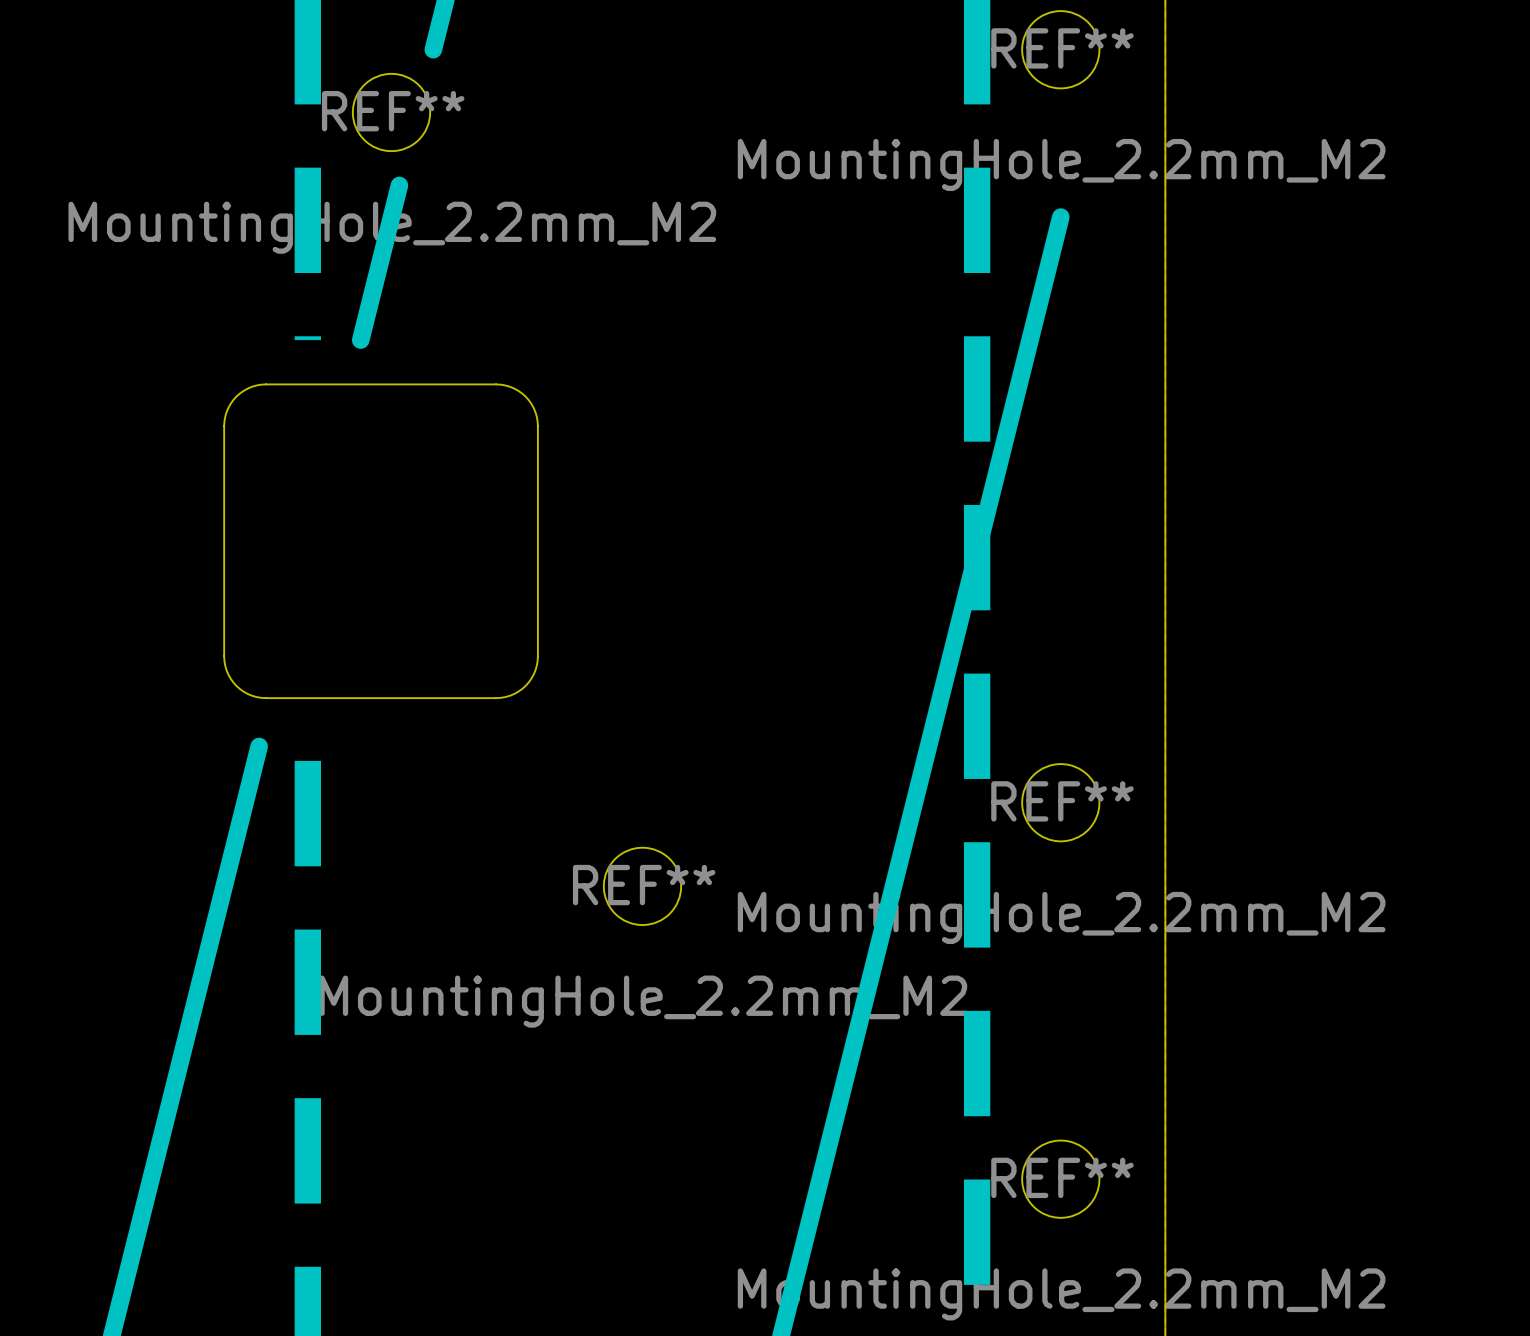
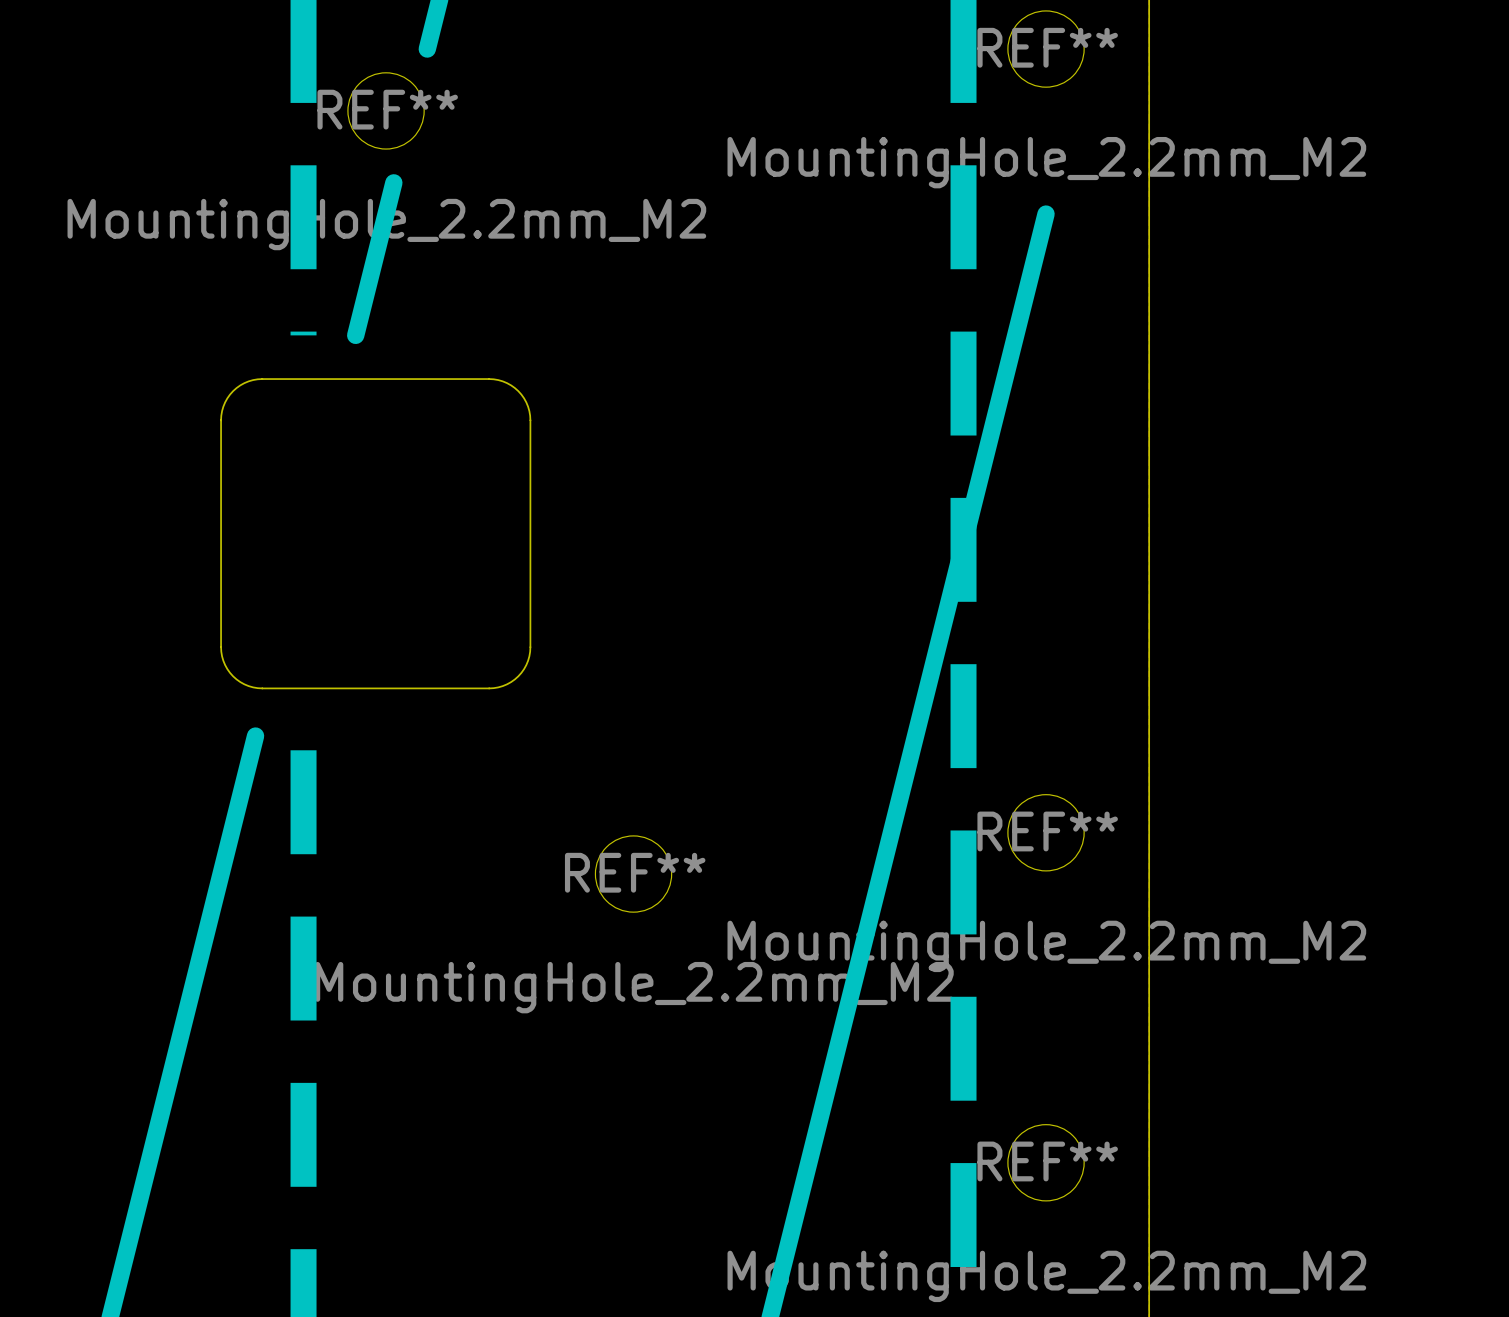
REF** position: (1060, 802) -> (1046, 832)

